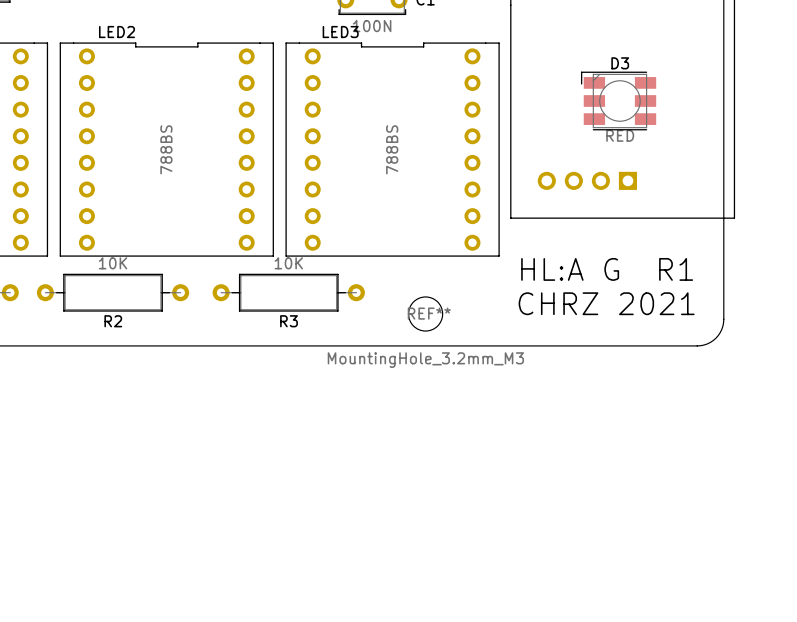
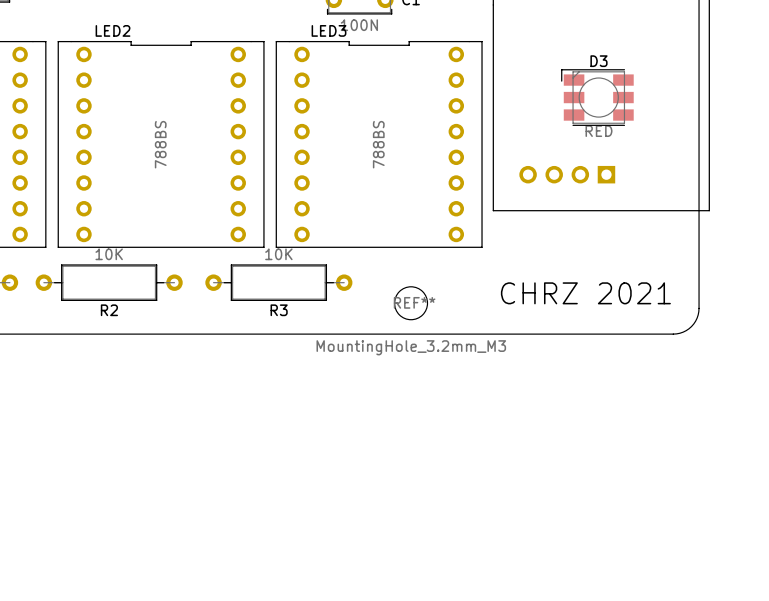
text: HL:A G R1 (607, 269) -> none

